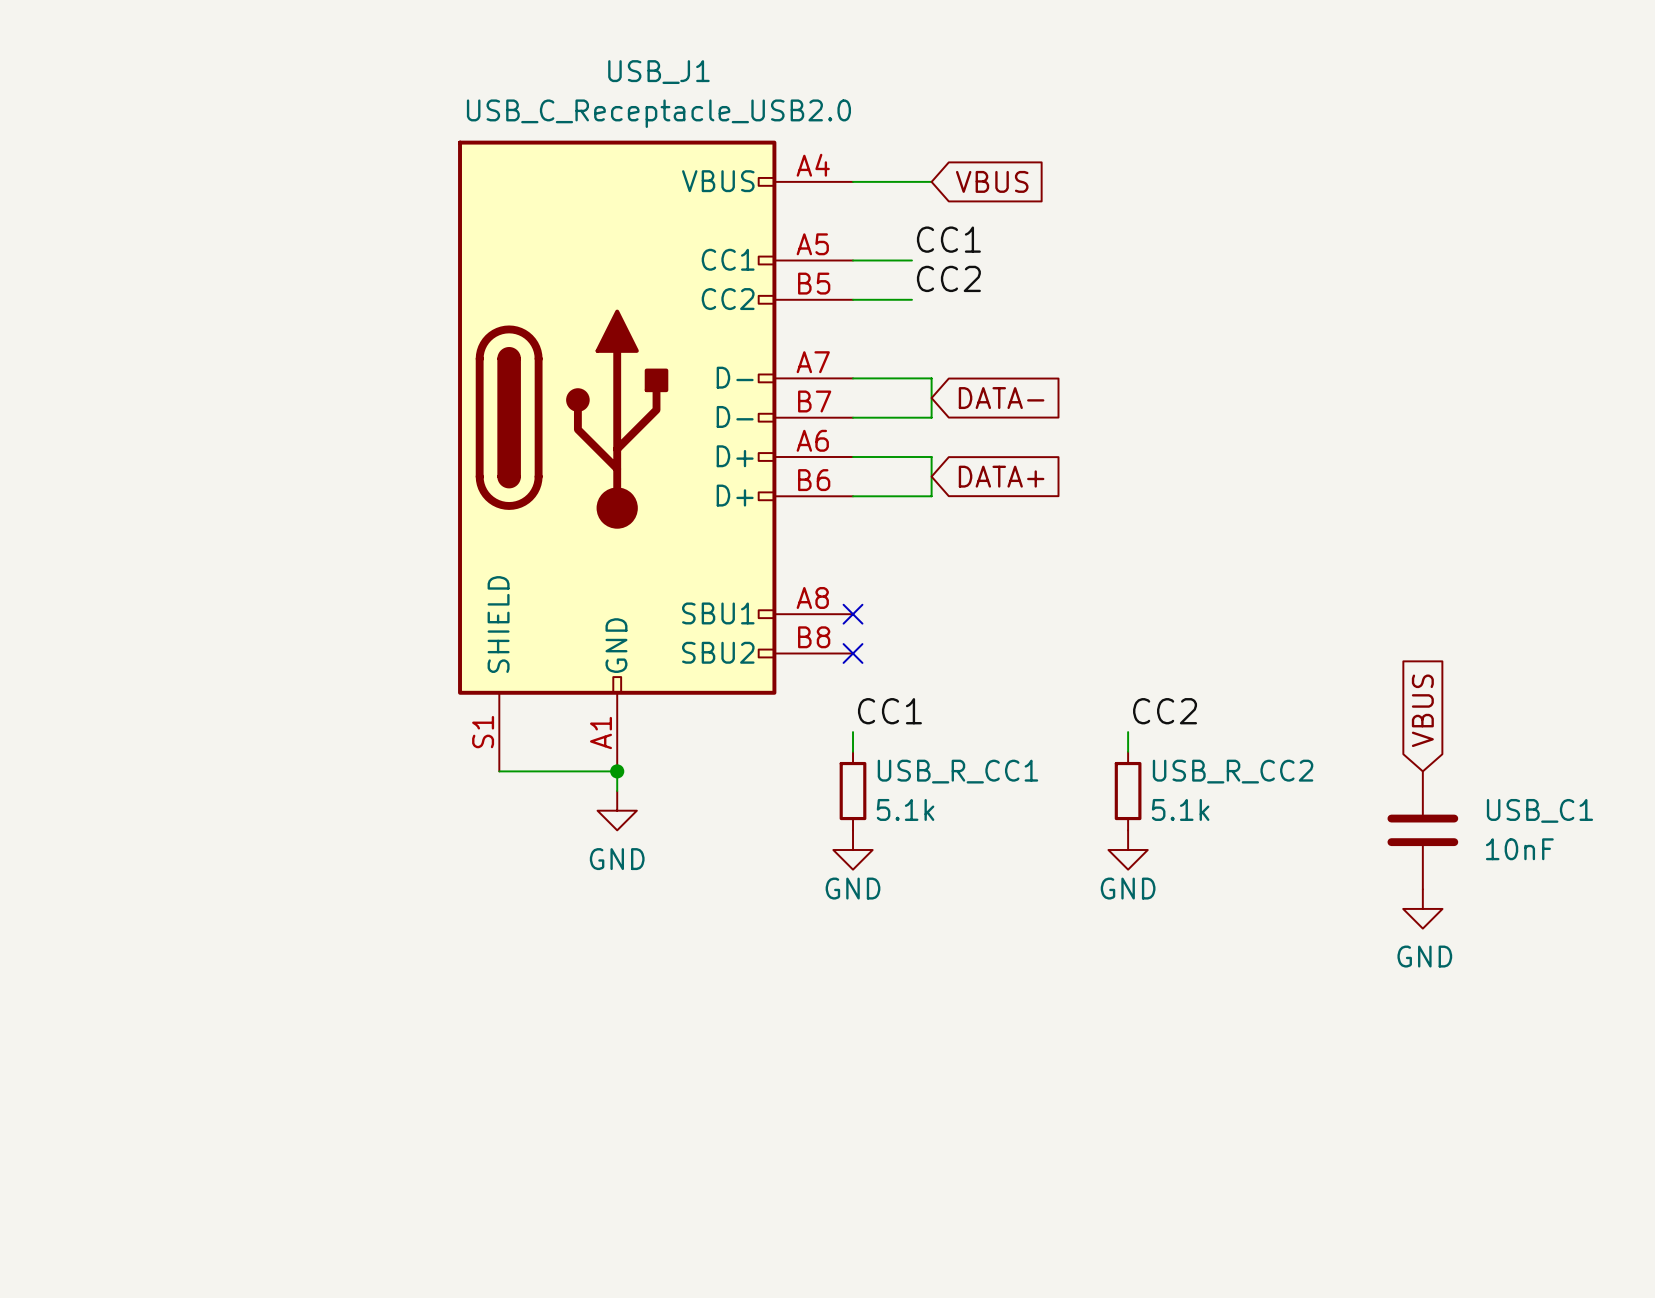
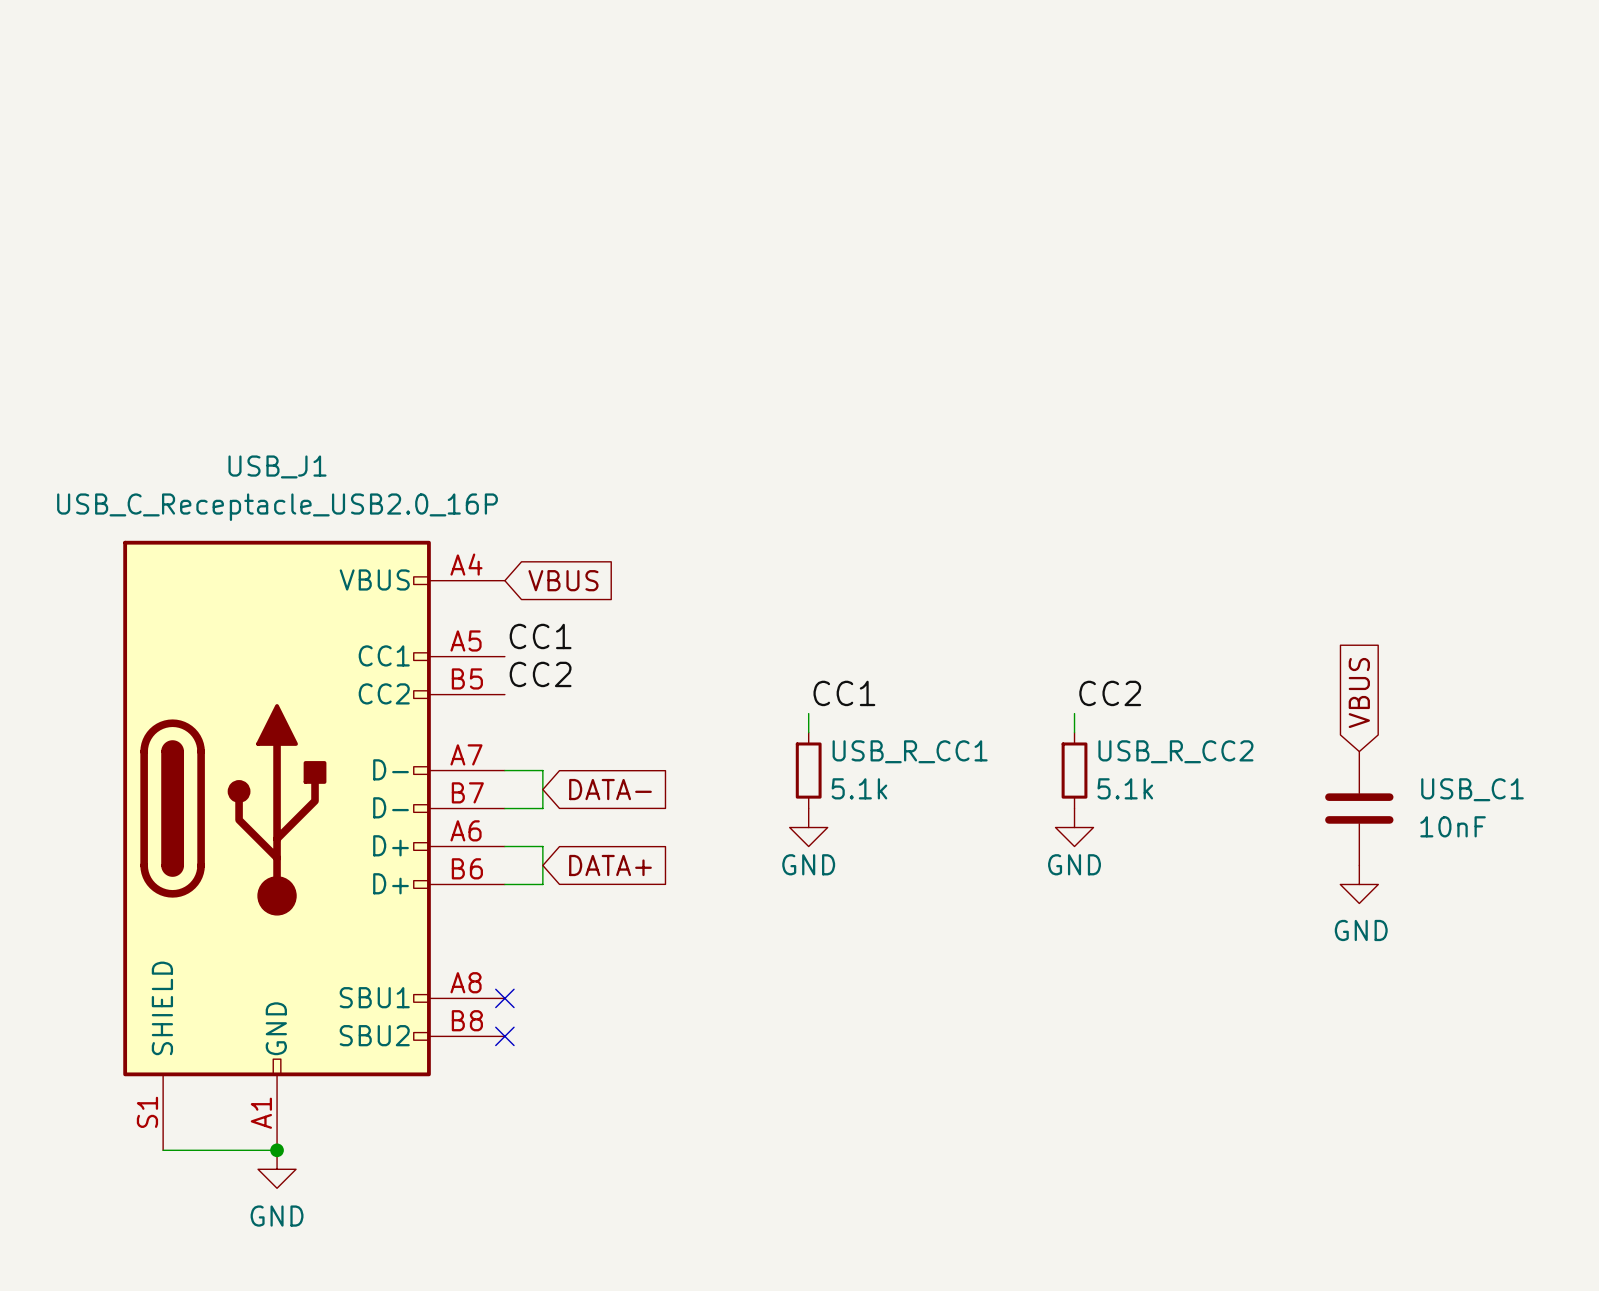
USB_J1 name position: USB_J1 (658, 72) -> USB_J1 (277, 466)
USB_J1 value: USB_C_Receptacle_USB2.0 (658, 113) -> USB_C_Receptacle_USB2.0_16P (277, 507)
wire: (853, 181) (931, 181) -> none
global label: VBUS (992, 181) -> none
label: CC1 (948, 239) -> none
wire: (853, 260) (911, 260) -> none
label: CC2 (948, 278) -> none
wire: (853, 299) (911, 299) -> none
wire: (853, 378) (931, 378) (931, 417) (853, 417) -> none
global label: DATA- (1001, 398) -> none
USB_J1 position: (655, 456) -> (314, 845)
wire: (853, 456) (931, 456) (931, 496) (853, 496) -> none
global label: DATA+ (1001, 476) -> none
global label: none -> VBUS (563, 580)
no-connect mark: (853, 614) -> none
label: none -> CC1 (540, 636)
no-connect mark: (853, 653) -> none
label: none -> CC2 (540, 674)
wire: (499, 771) (617, 771) (617, 791) -> none
junction: (617, 771) -> none
wire: none -> (504, 770) (542, 770) (542, 808) (504, 808)
power symbol: GND (617, 810) -> none
global label: none -> DATA- (610, 789)
wire: none -> (504, 846) (542, 846) (542, 884) (504, 884)
global label: none -> DATA+ (610, 865)
no-connect mark: none -> (504, 998)
no-connect mark: none -> (504, 1036)
wire: none -> (163, 1150) (277, 1150)
junction: none -> (277, 1150)
power symbol: none -> GND (277, 1169)

